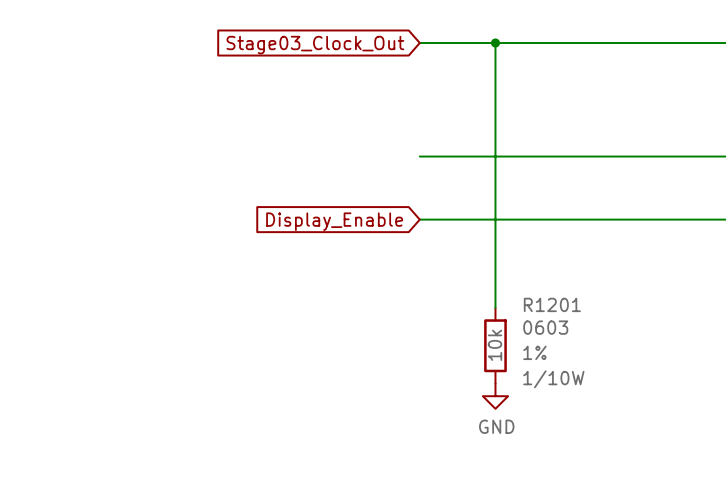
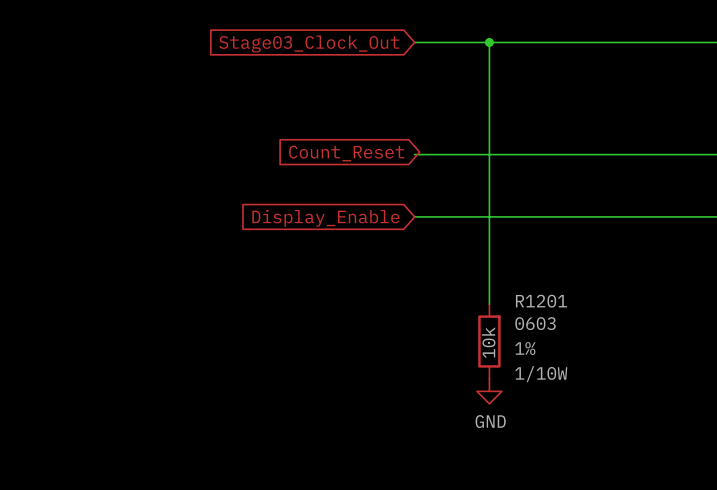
global label: none -> Count_Reset (346, 153)

